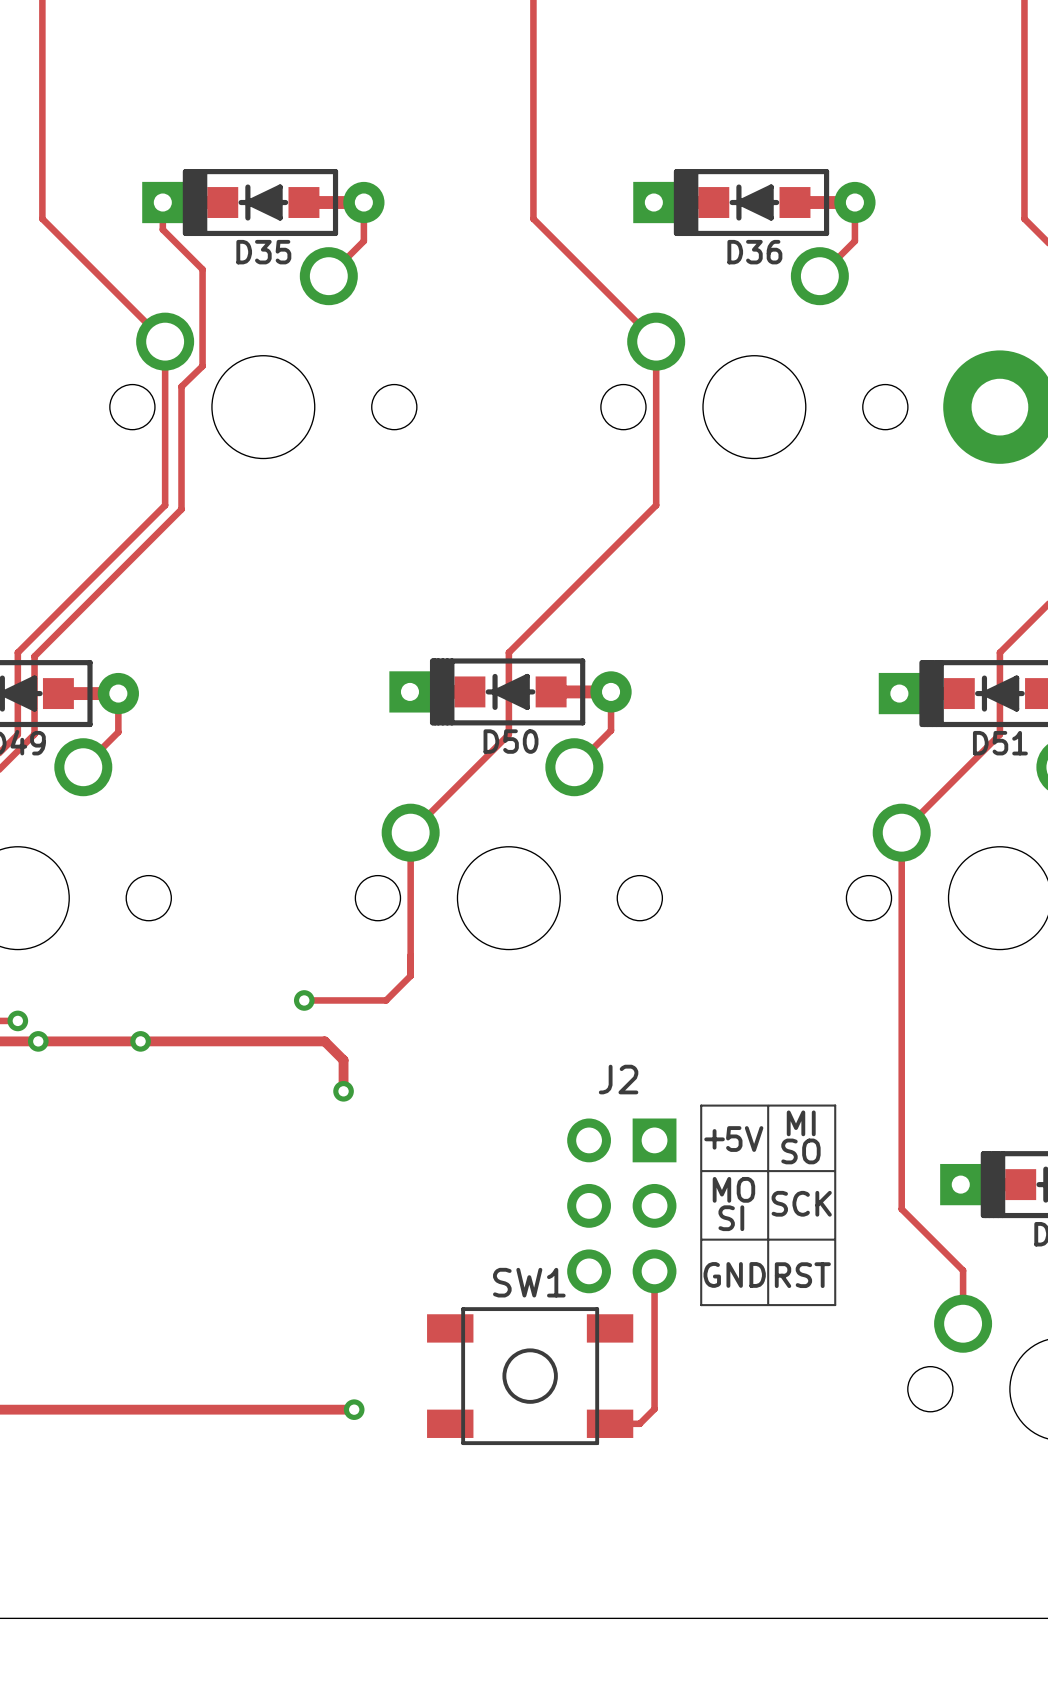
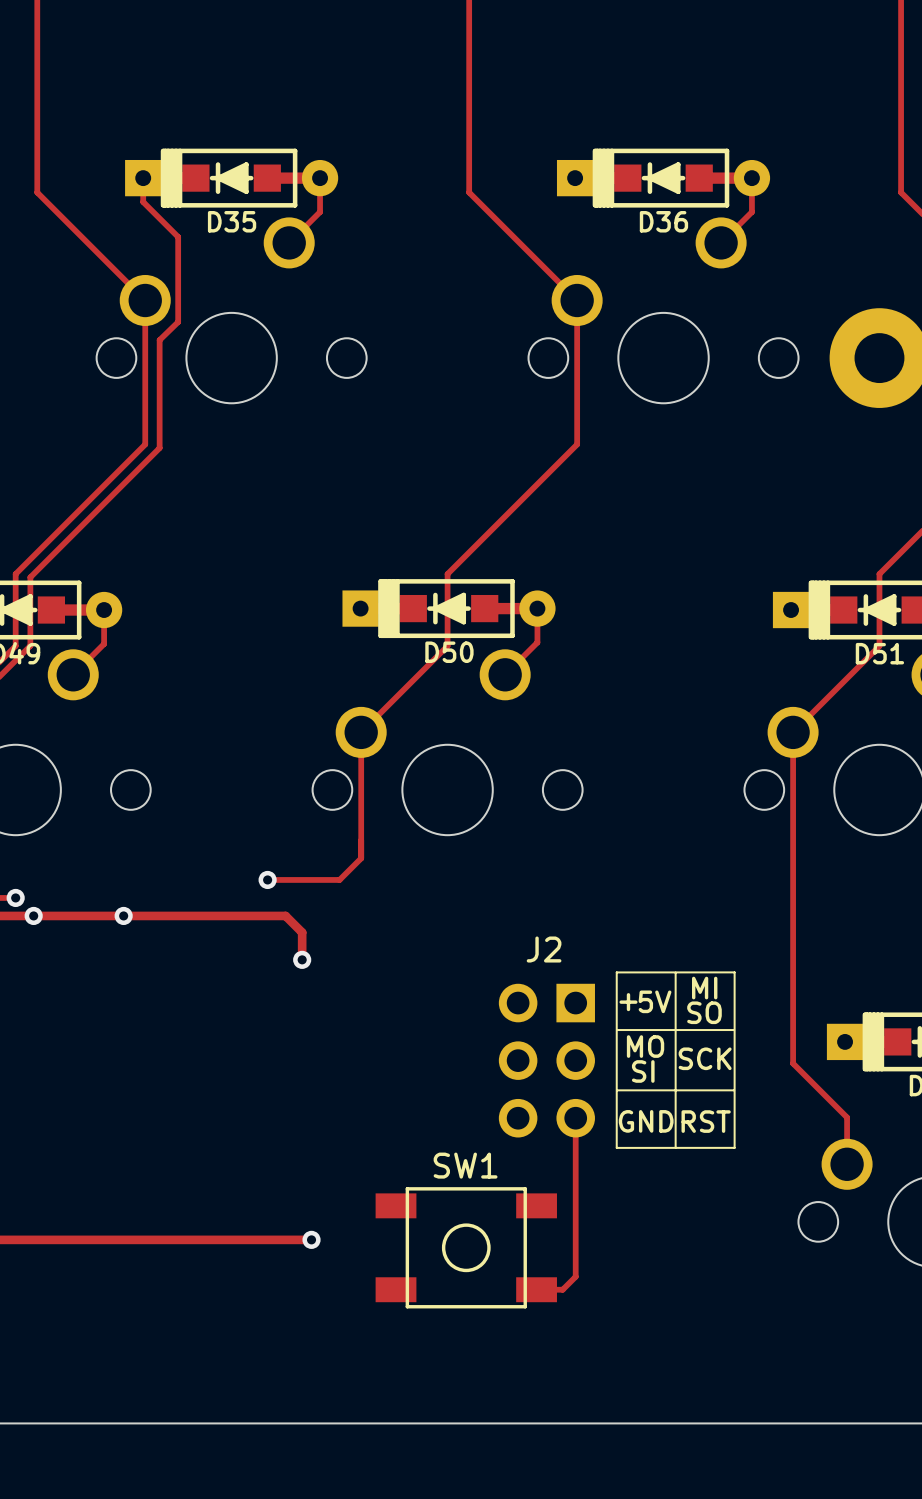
SW1 position: (530, 1376) -> (466, 1247)
track: (654, 1409) (639, 1423) (610, 1423) -> (575, 1239) (575, 1276) (562, 1289) (536, 1289)

